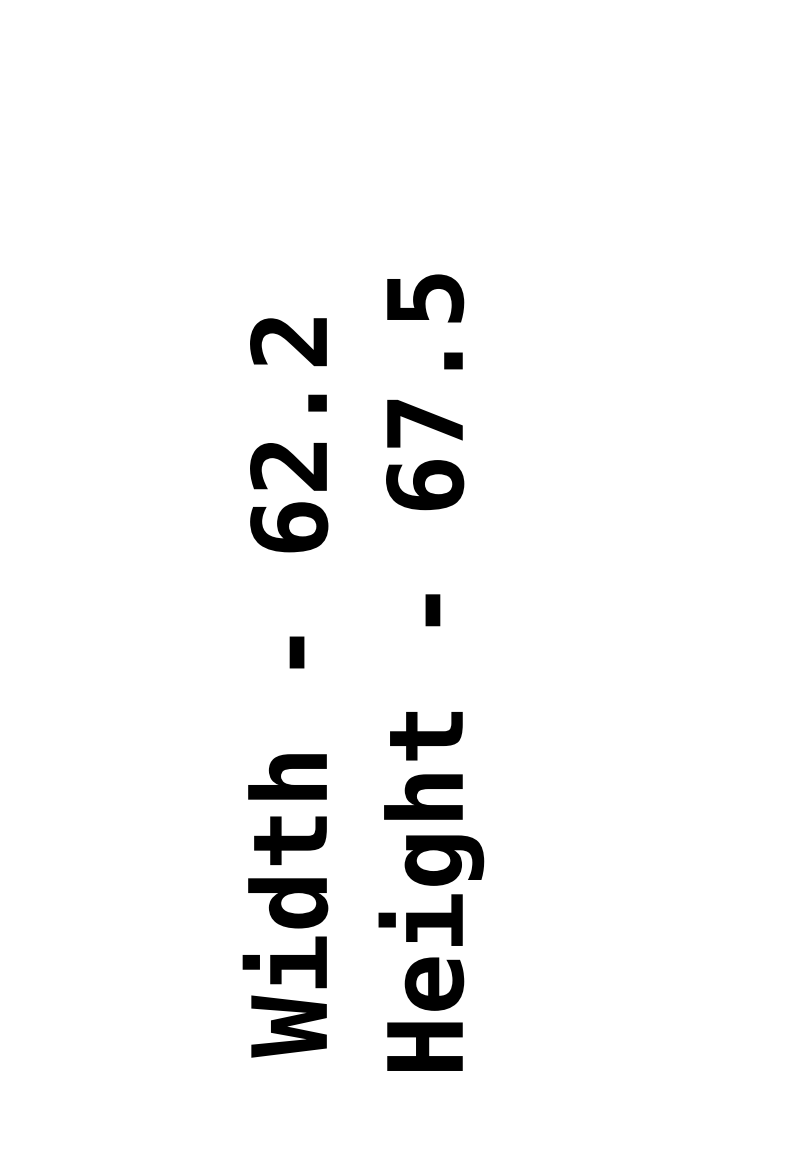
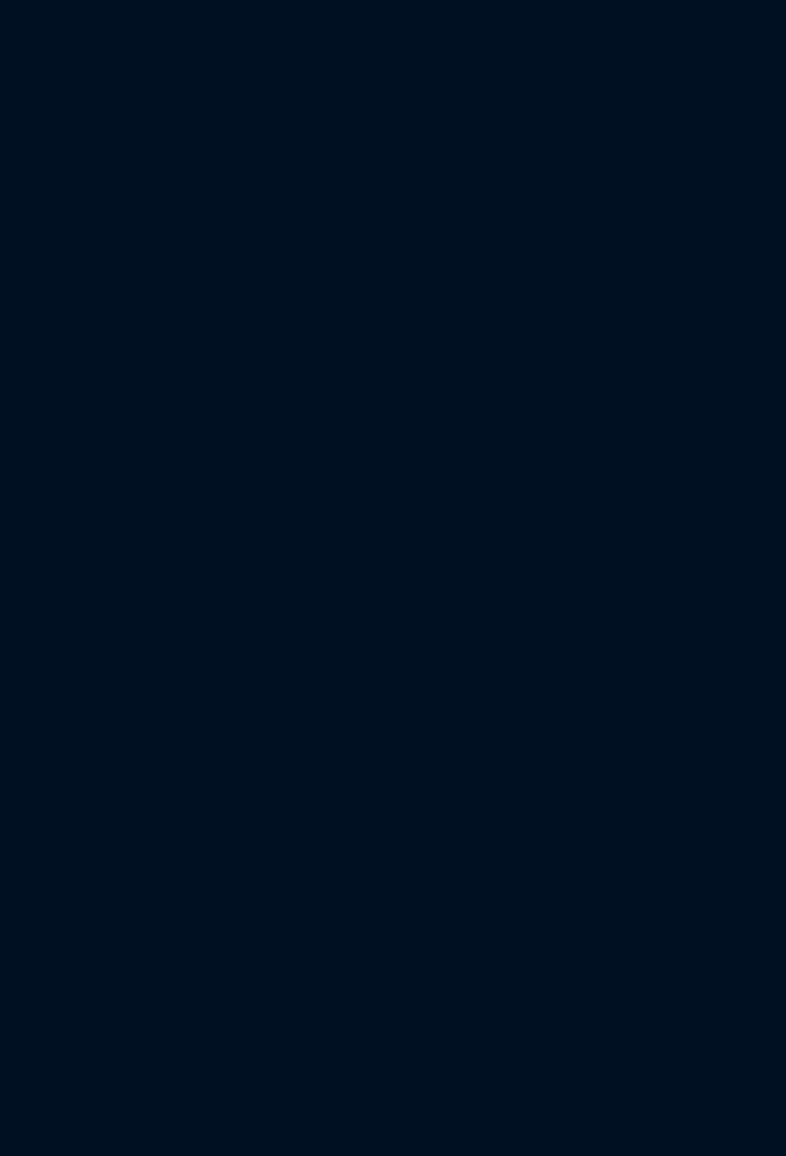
text: Height - 67.5 (431, 672) -> none
text: Width - 62.2 (285, 687) -> none

